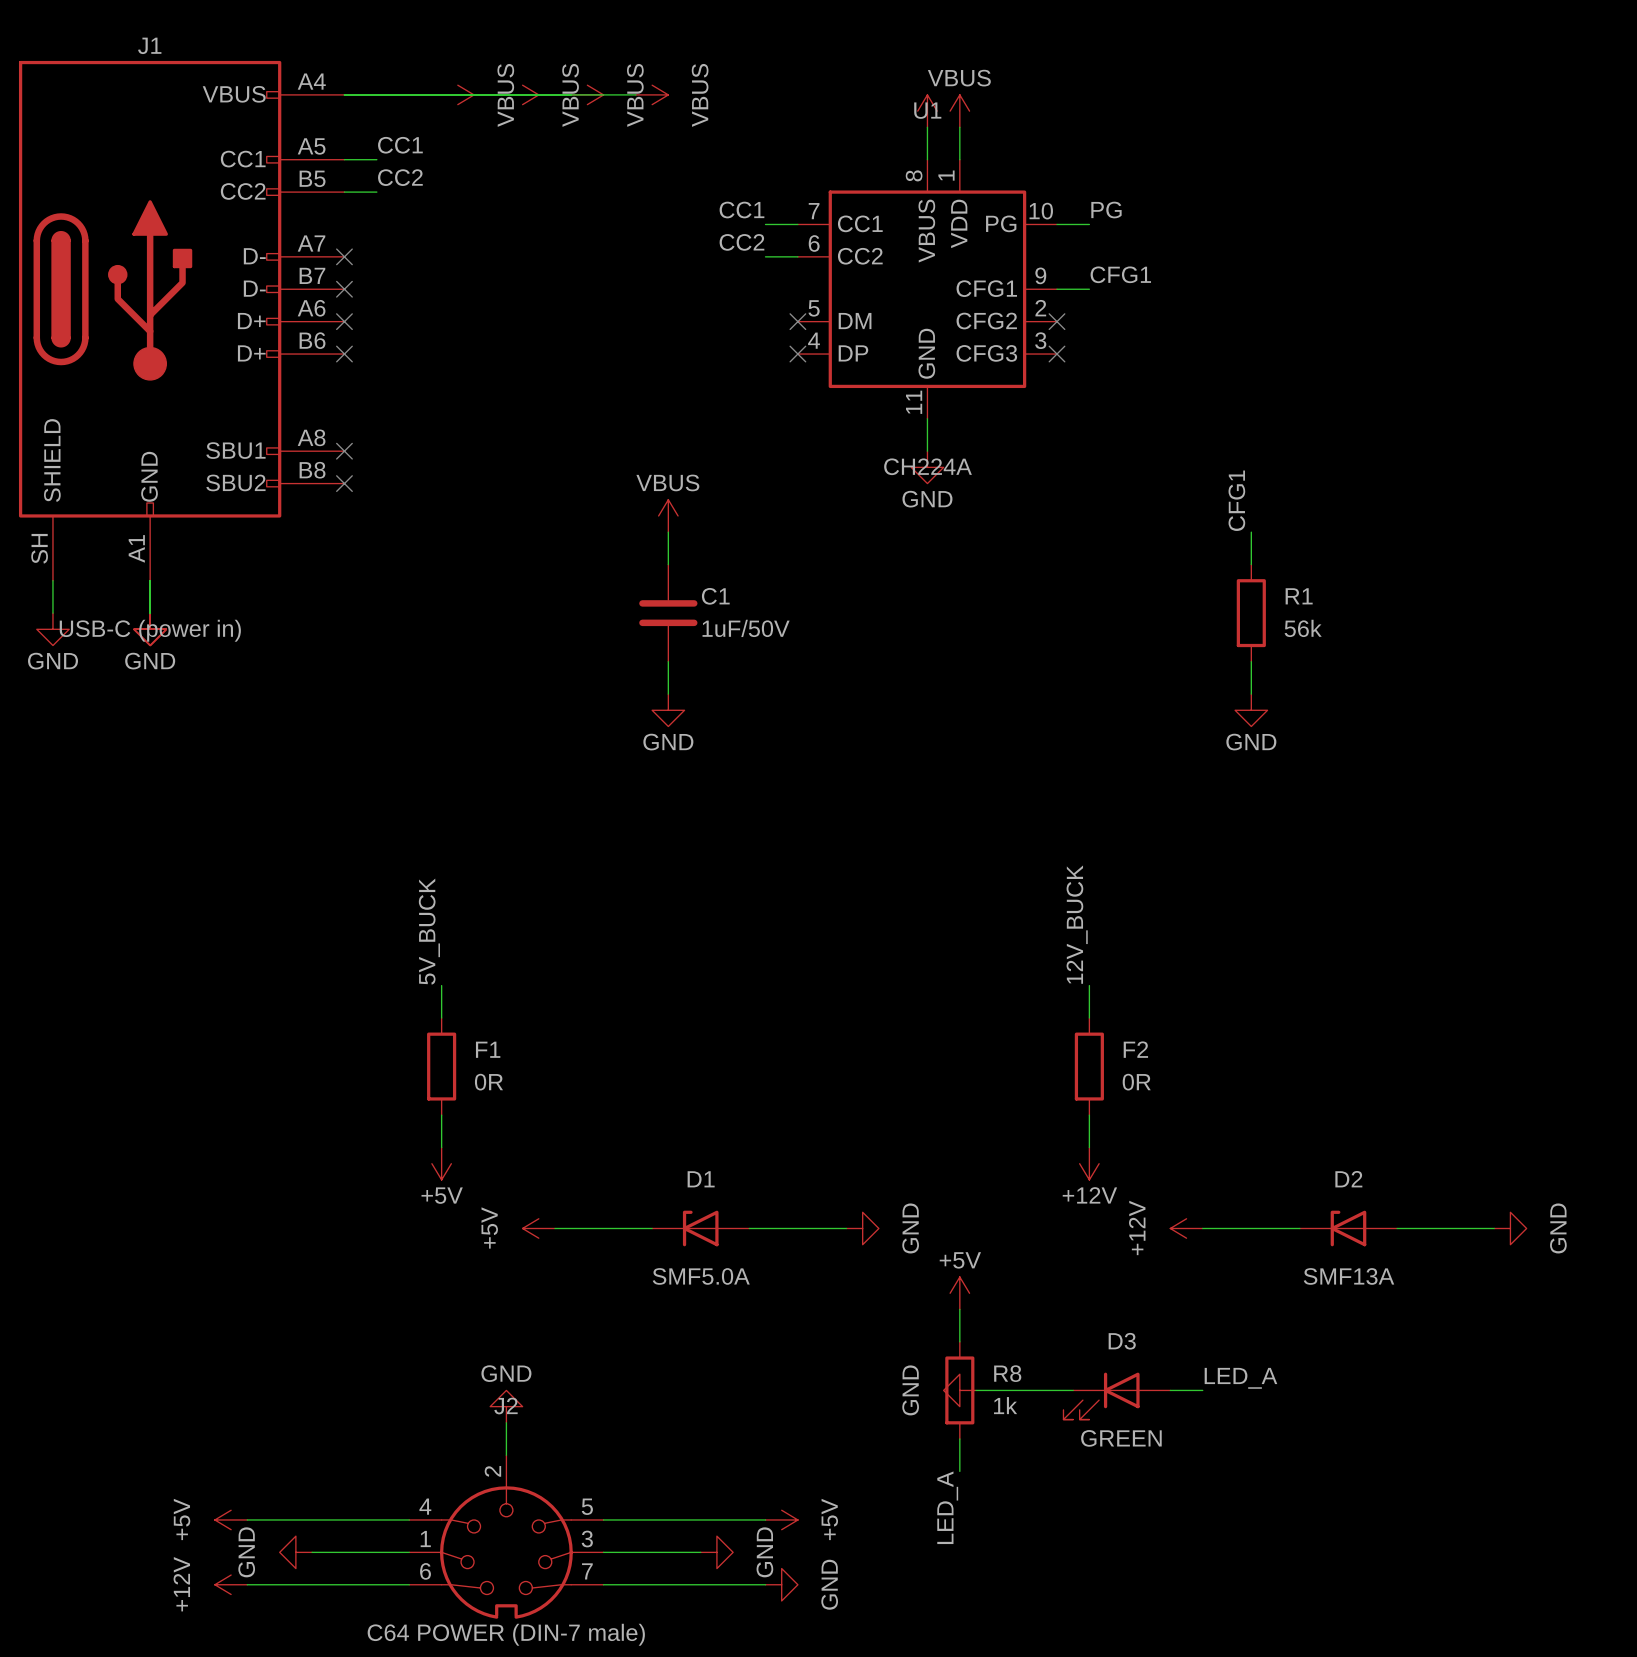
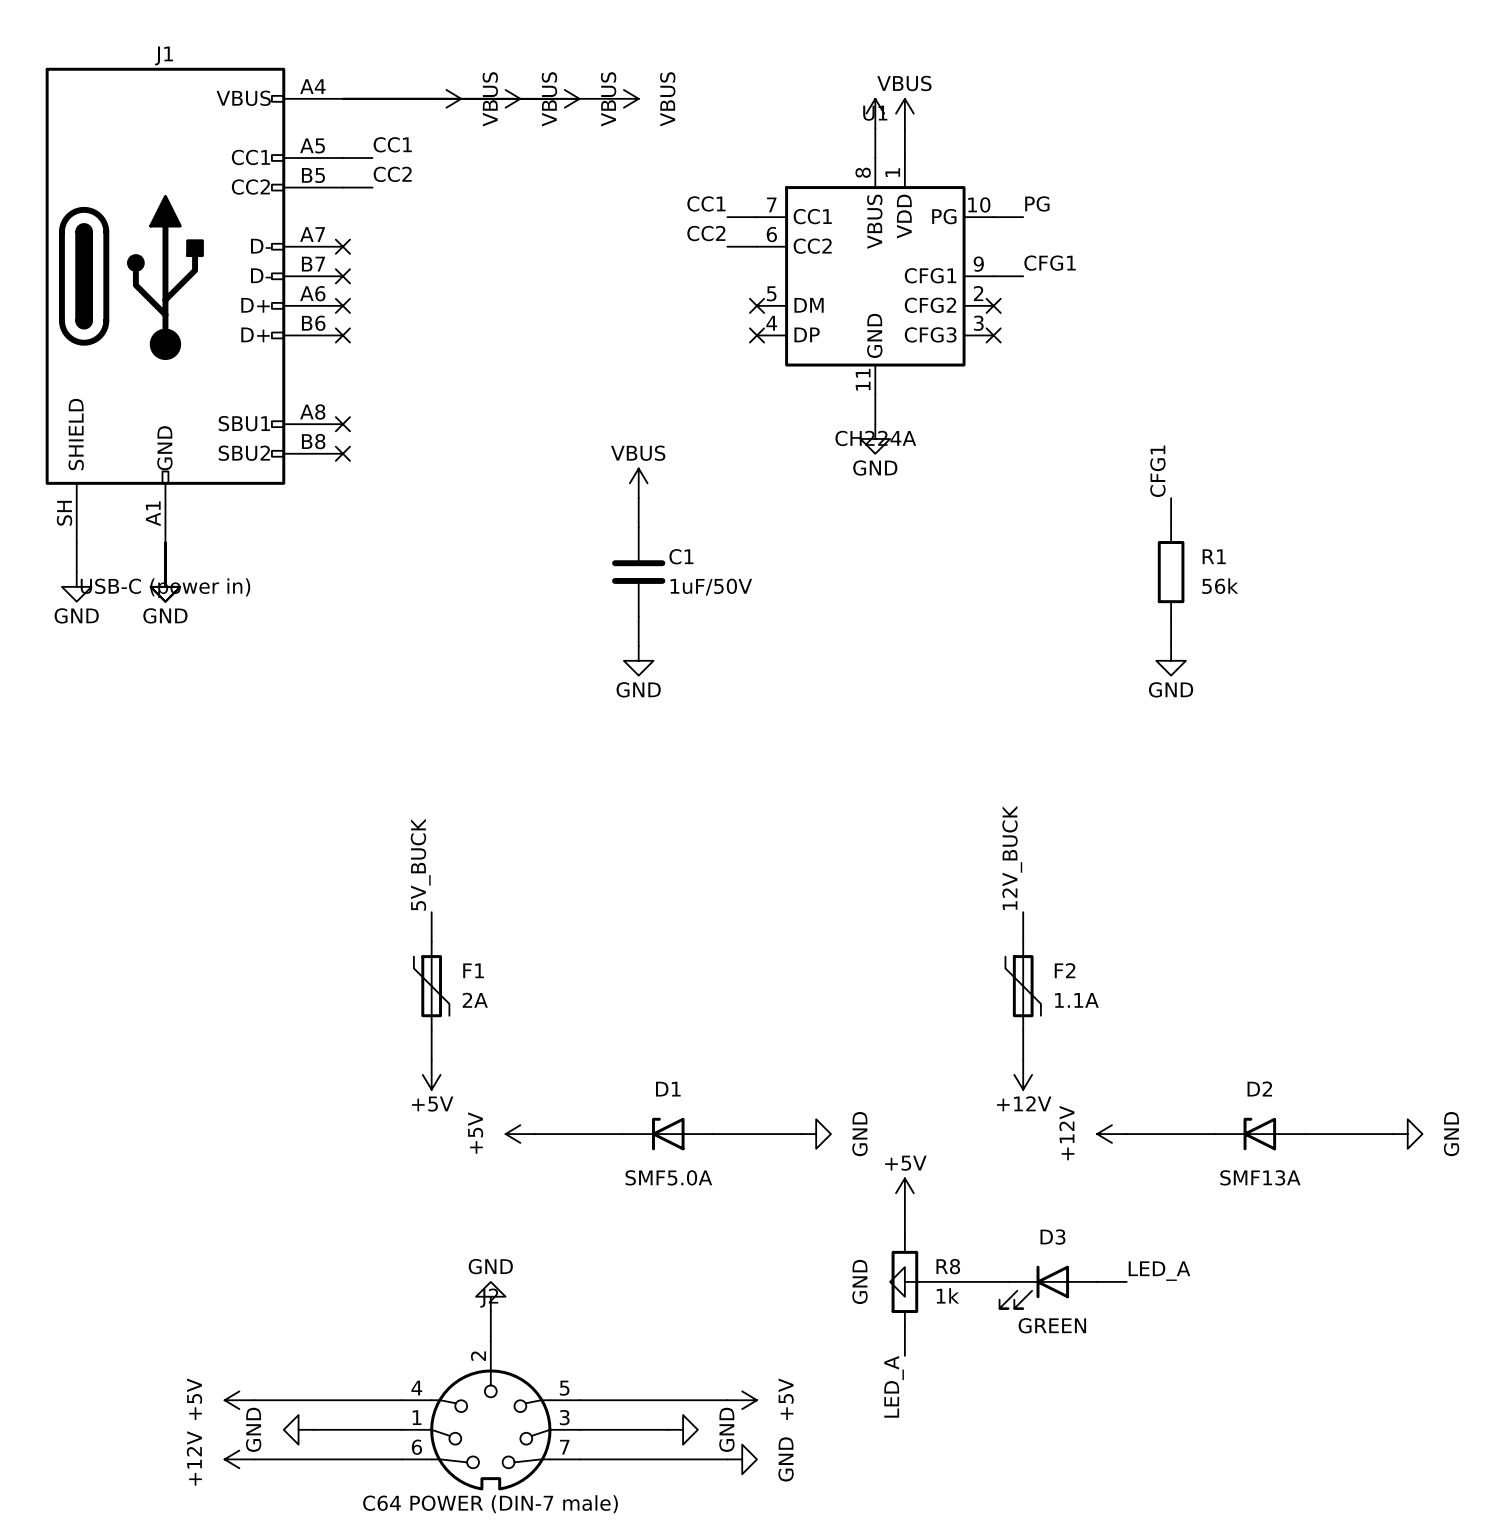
F1 symbol: [427, 1017, 457, 1116] -> [413, 941, 450, 1031]
F2 symbol: [1074, 1017, 1104, 1116] -> [1005, 941, 1041, 1031]
F1 value: 0R (488, 1082) -> 2A (475, 1000)
F2 value: 0R (1136, 1082) -> 1.1A (1076, 1000)

